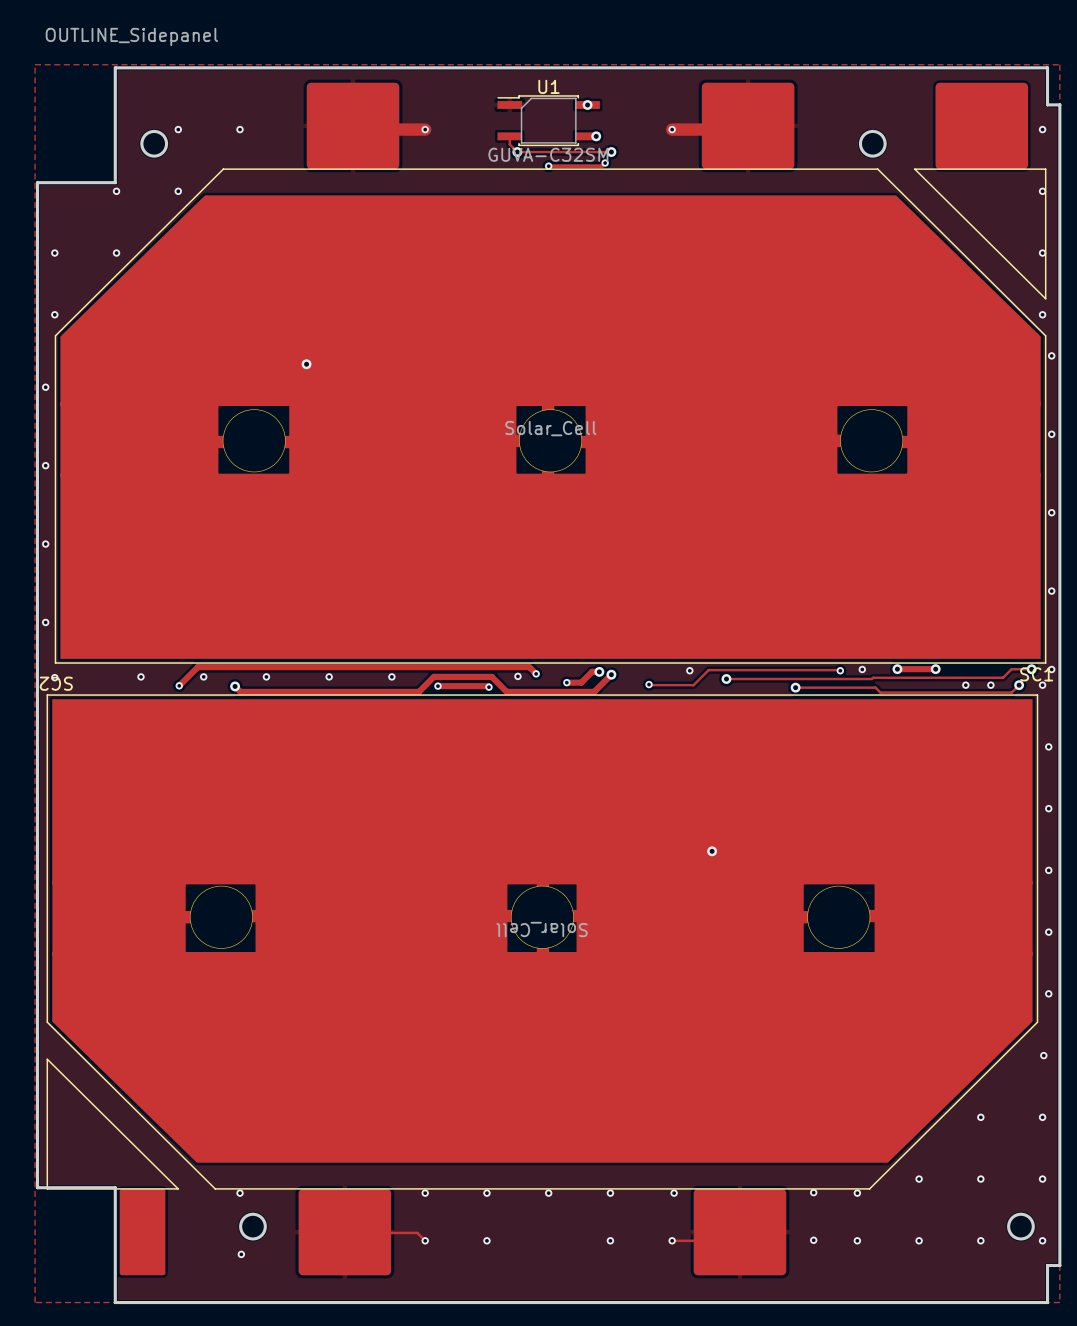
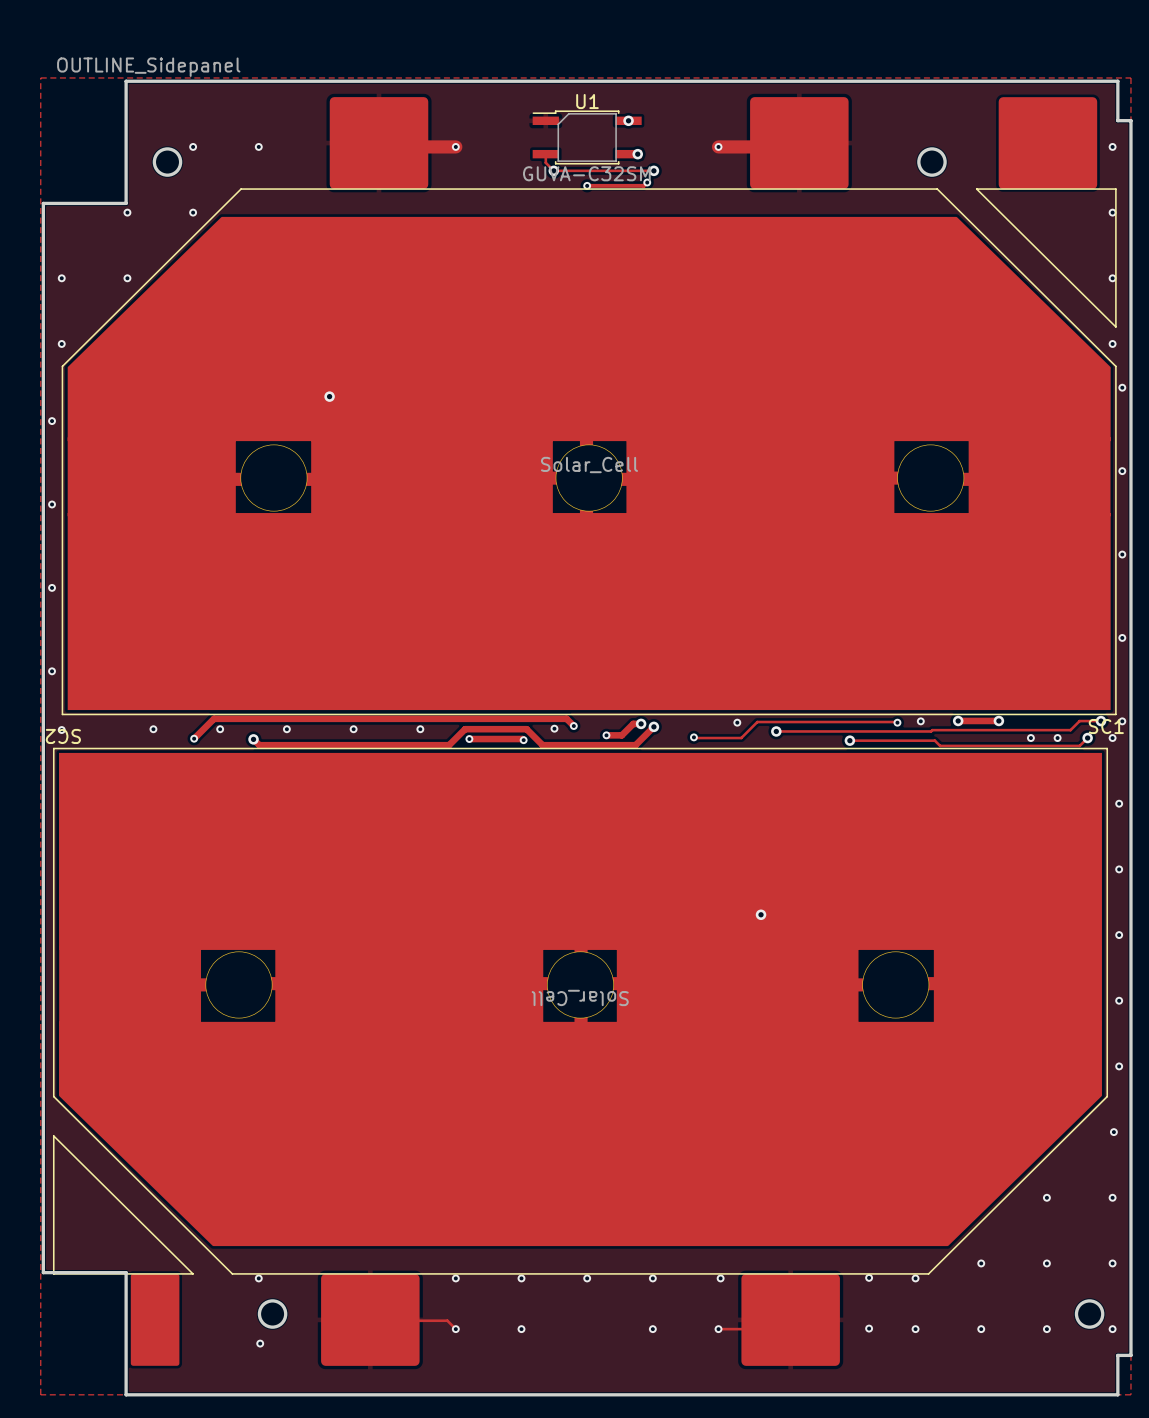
drawing shape: [35, 27, 1062, 1305] -> [41, 57, 1133, 1397]

